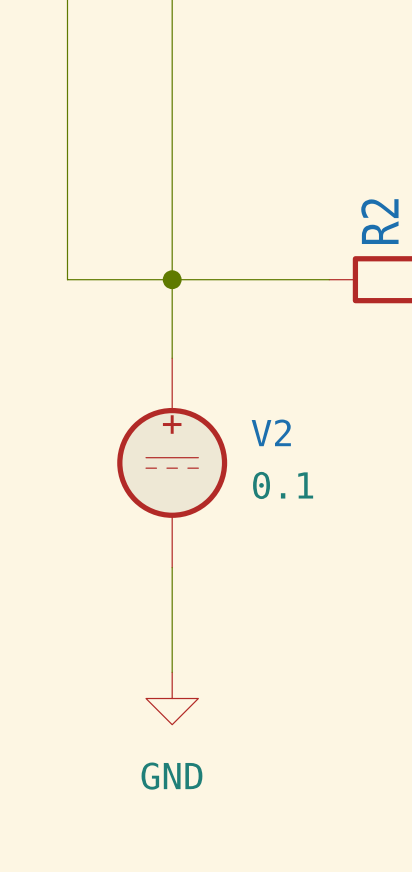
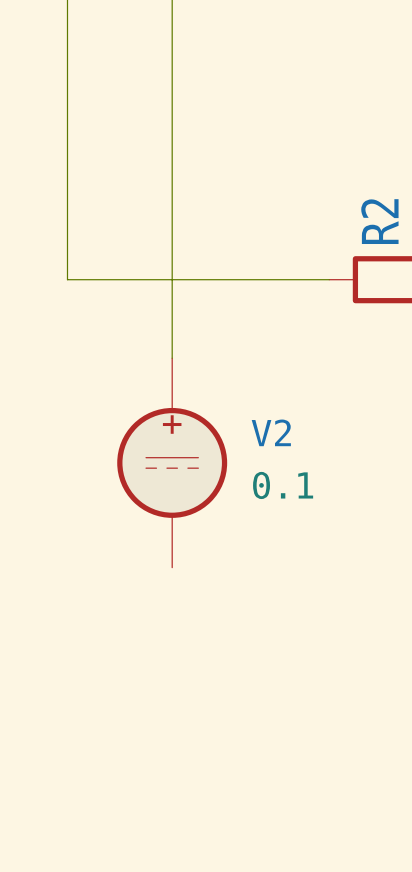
junction: (172, 279) -> none
wire: (172, 567) (172, 672) -> none
power symbol: GND (172, 698) -> none

